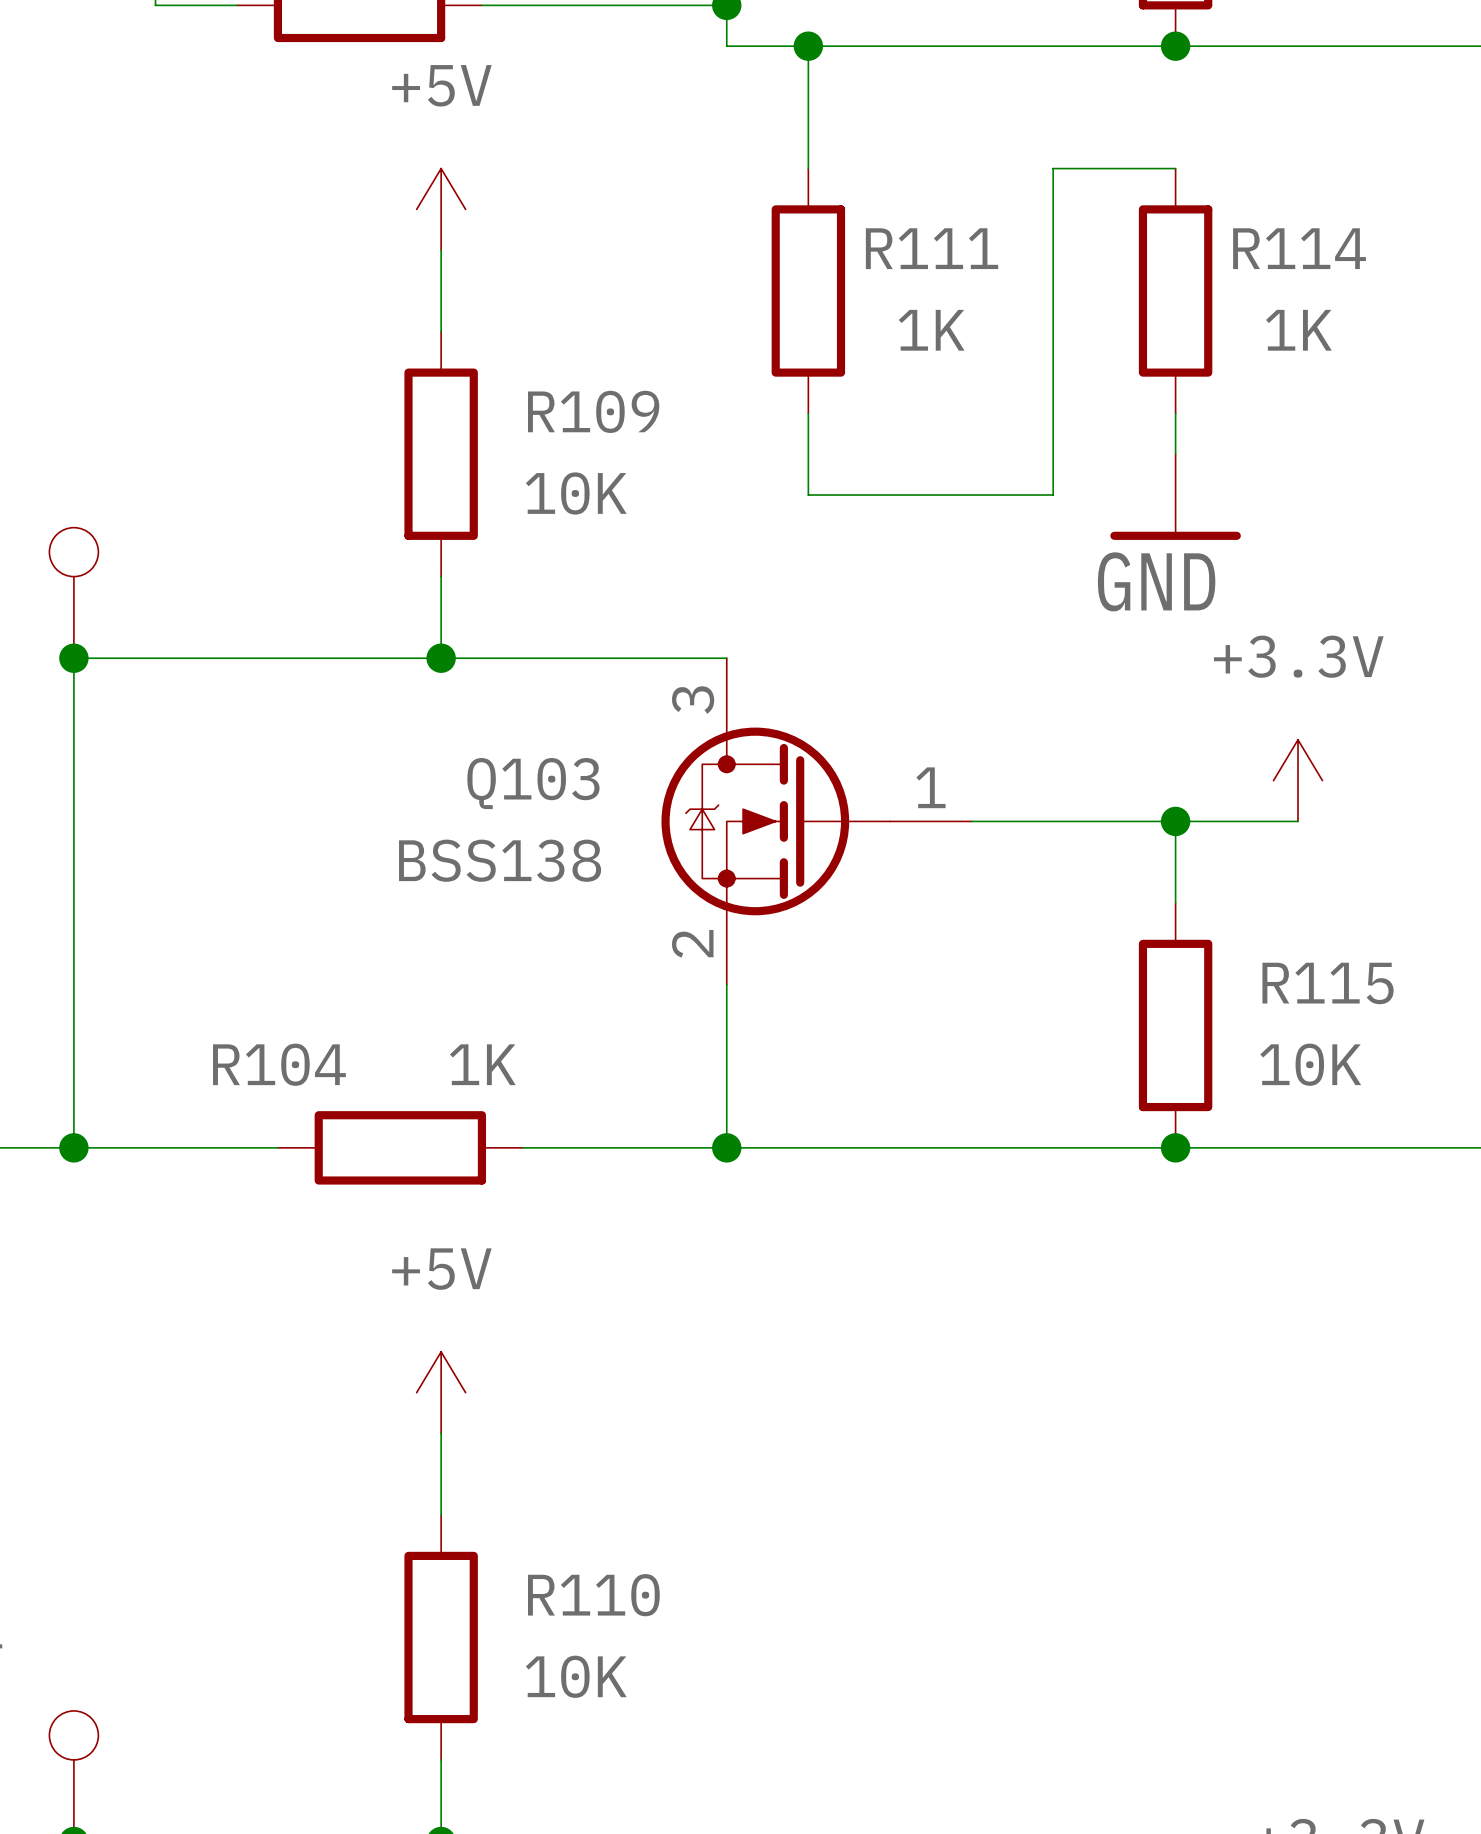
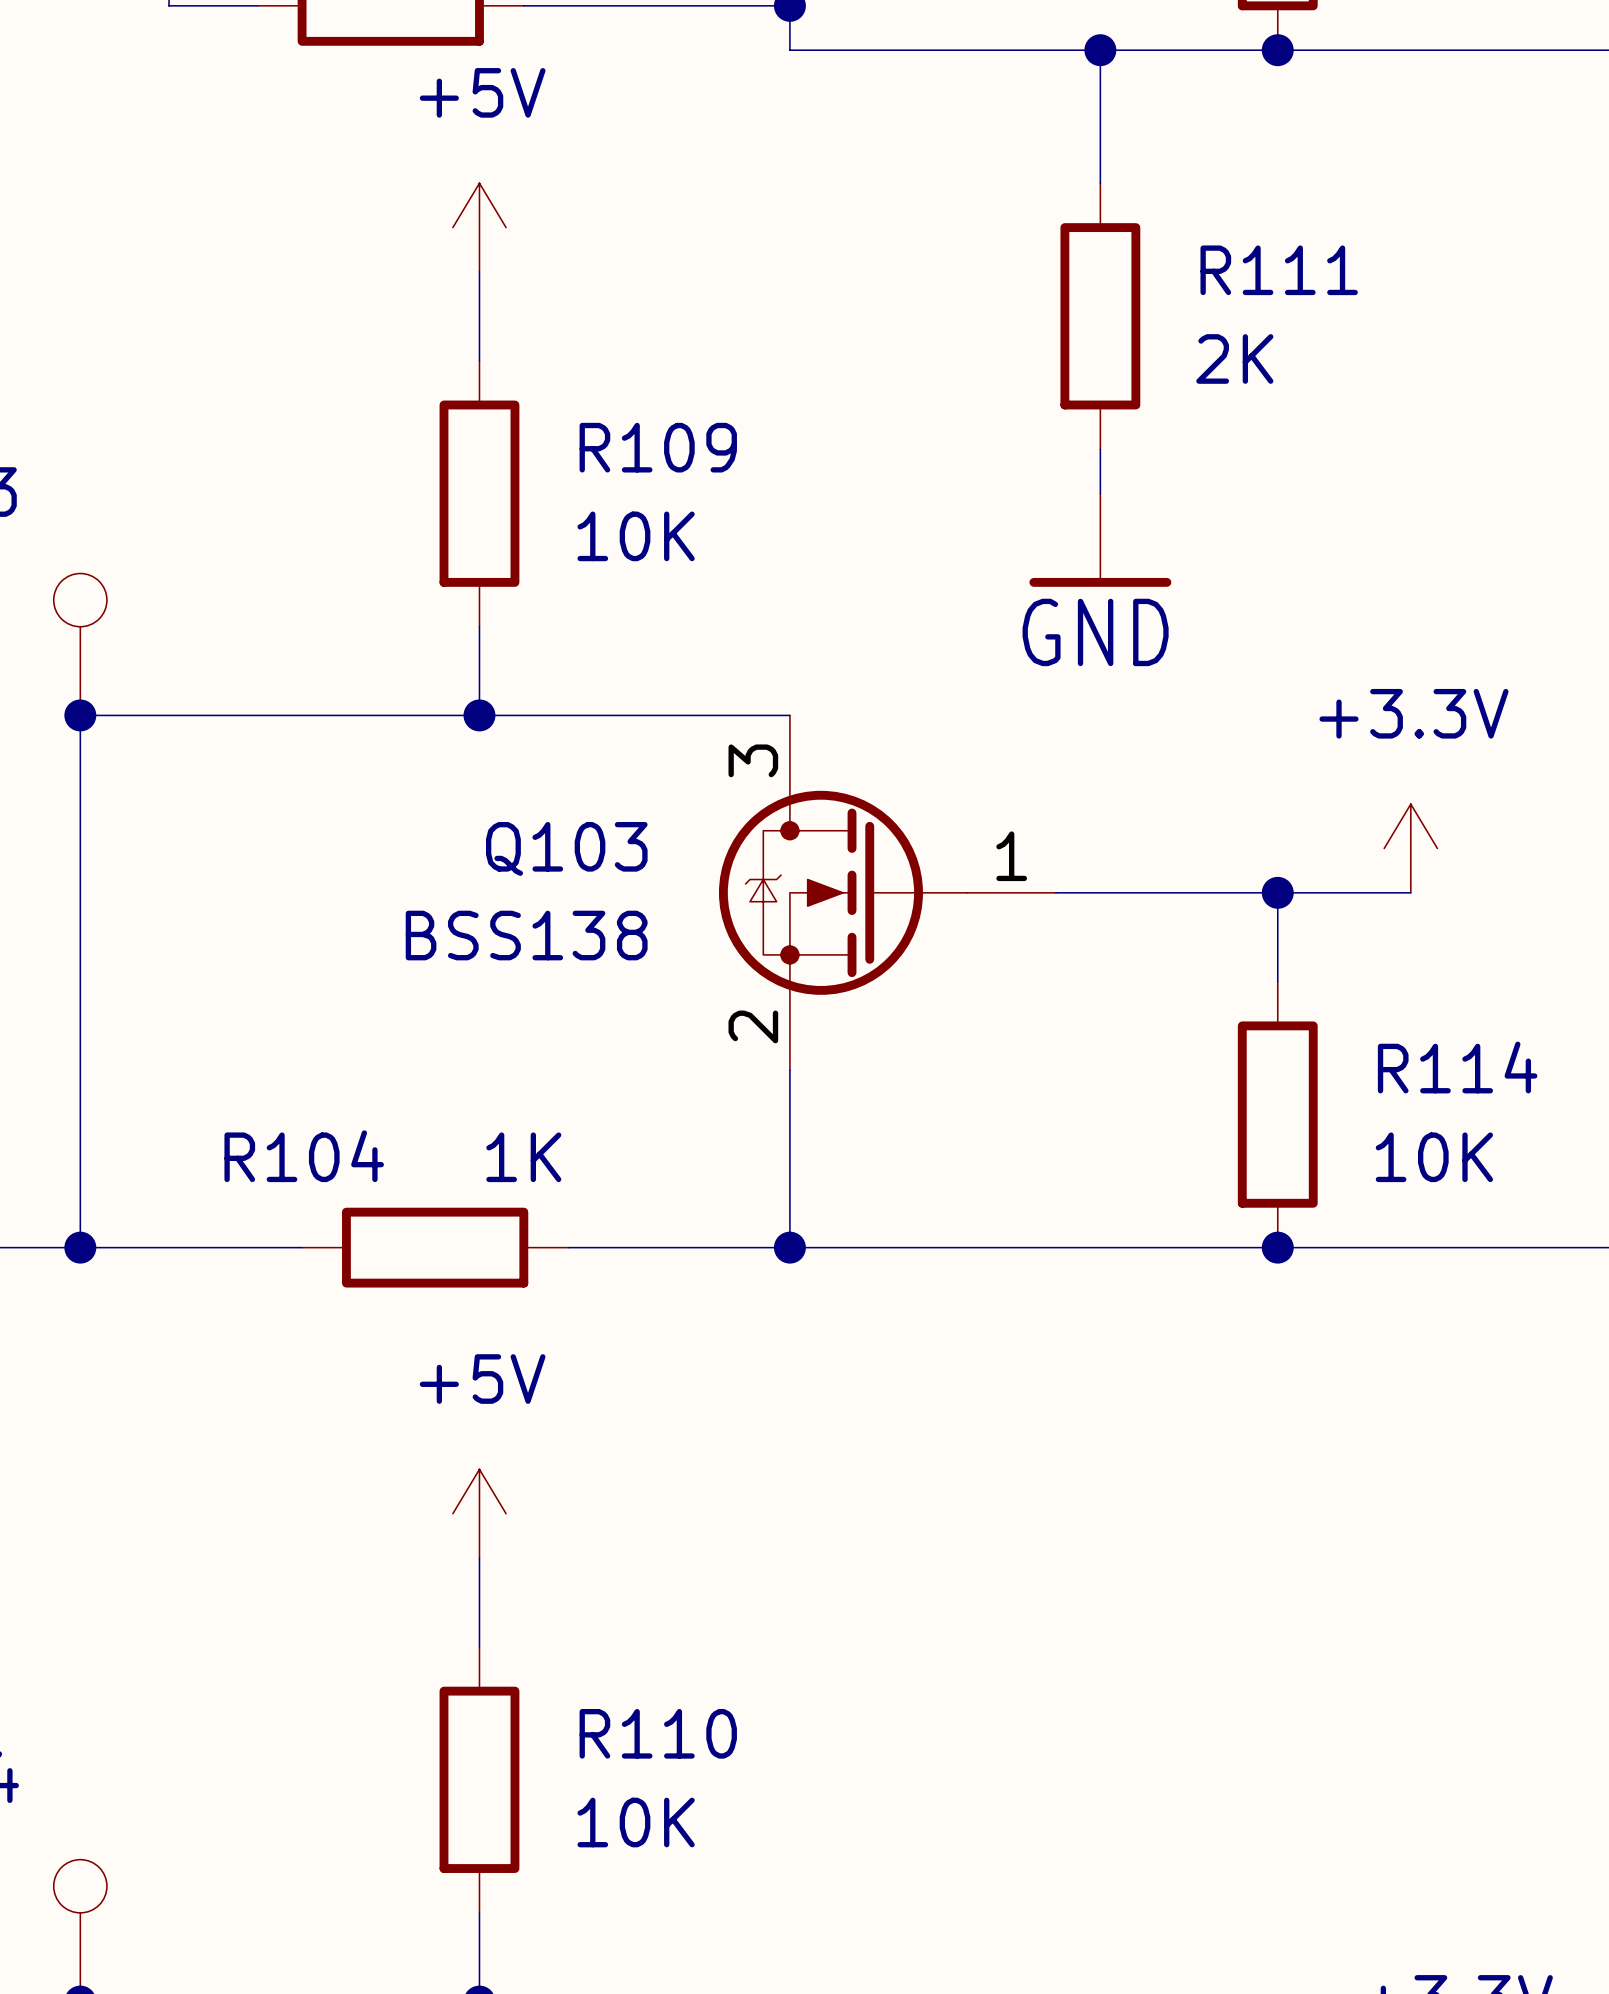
wire: (808, 46) (808, 168) -> (1100, 50) (1100, 183)
junction: (808, 46) -> none
junction: none -> (1100, 50)
wire: (1175, 168) (1053, 168) (1053, 495) (808, 495) (808, 413) -> none
R111 name position: R111 (932, 248) -> R111 (1279, 270)
R111 position: (808, 290) -> (1100, 316)
R114: 1K (1175, 290) -> none
R111 value: 1K (931, 330) -> 2K (1234, 358)
wire: (1175, 413) (1175, 454) -> (1100, 449) (1100, 493)
power symbol position: GND (1175, 497) -> GND (1100, 540)
R115 name: R115 (1328, 983) -> R114 (1457, 1067)

